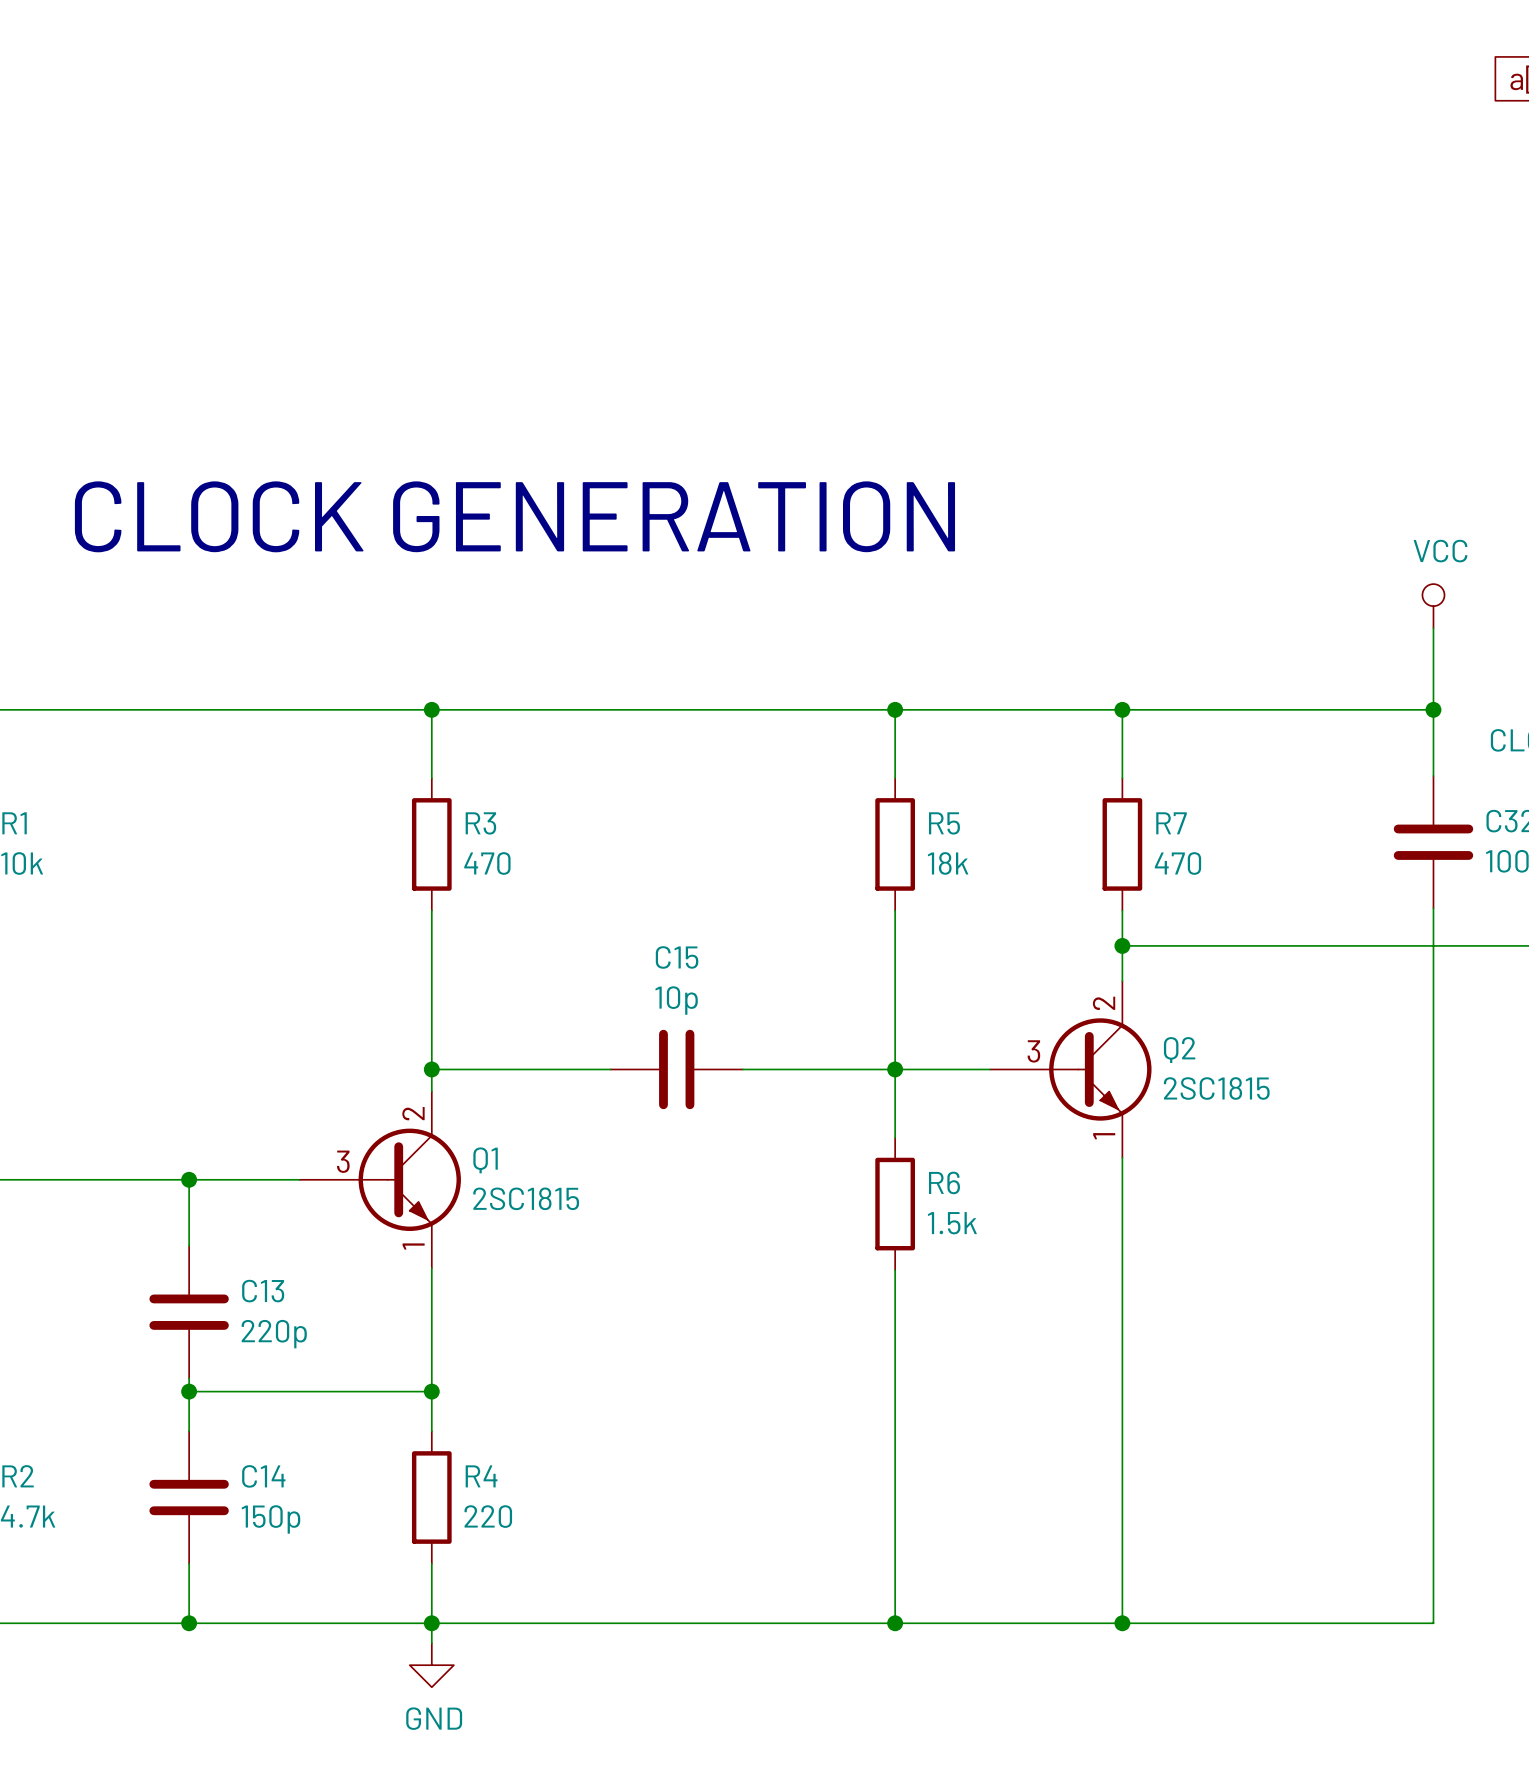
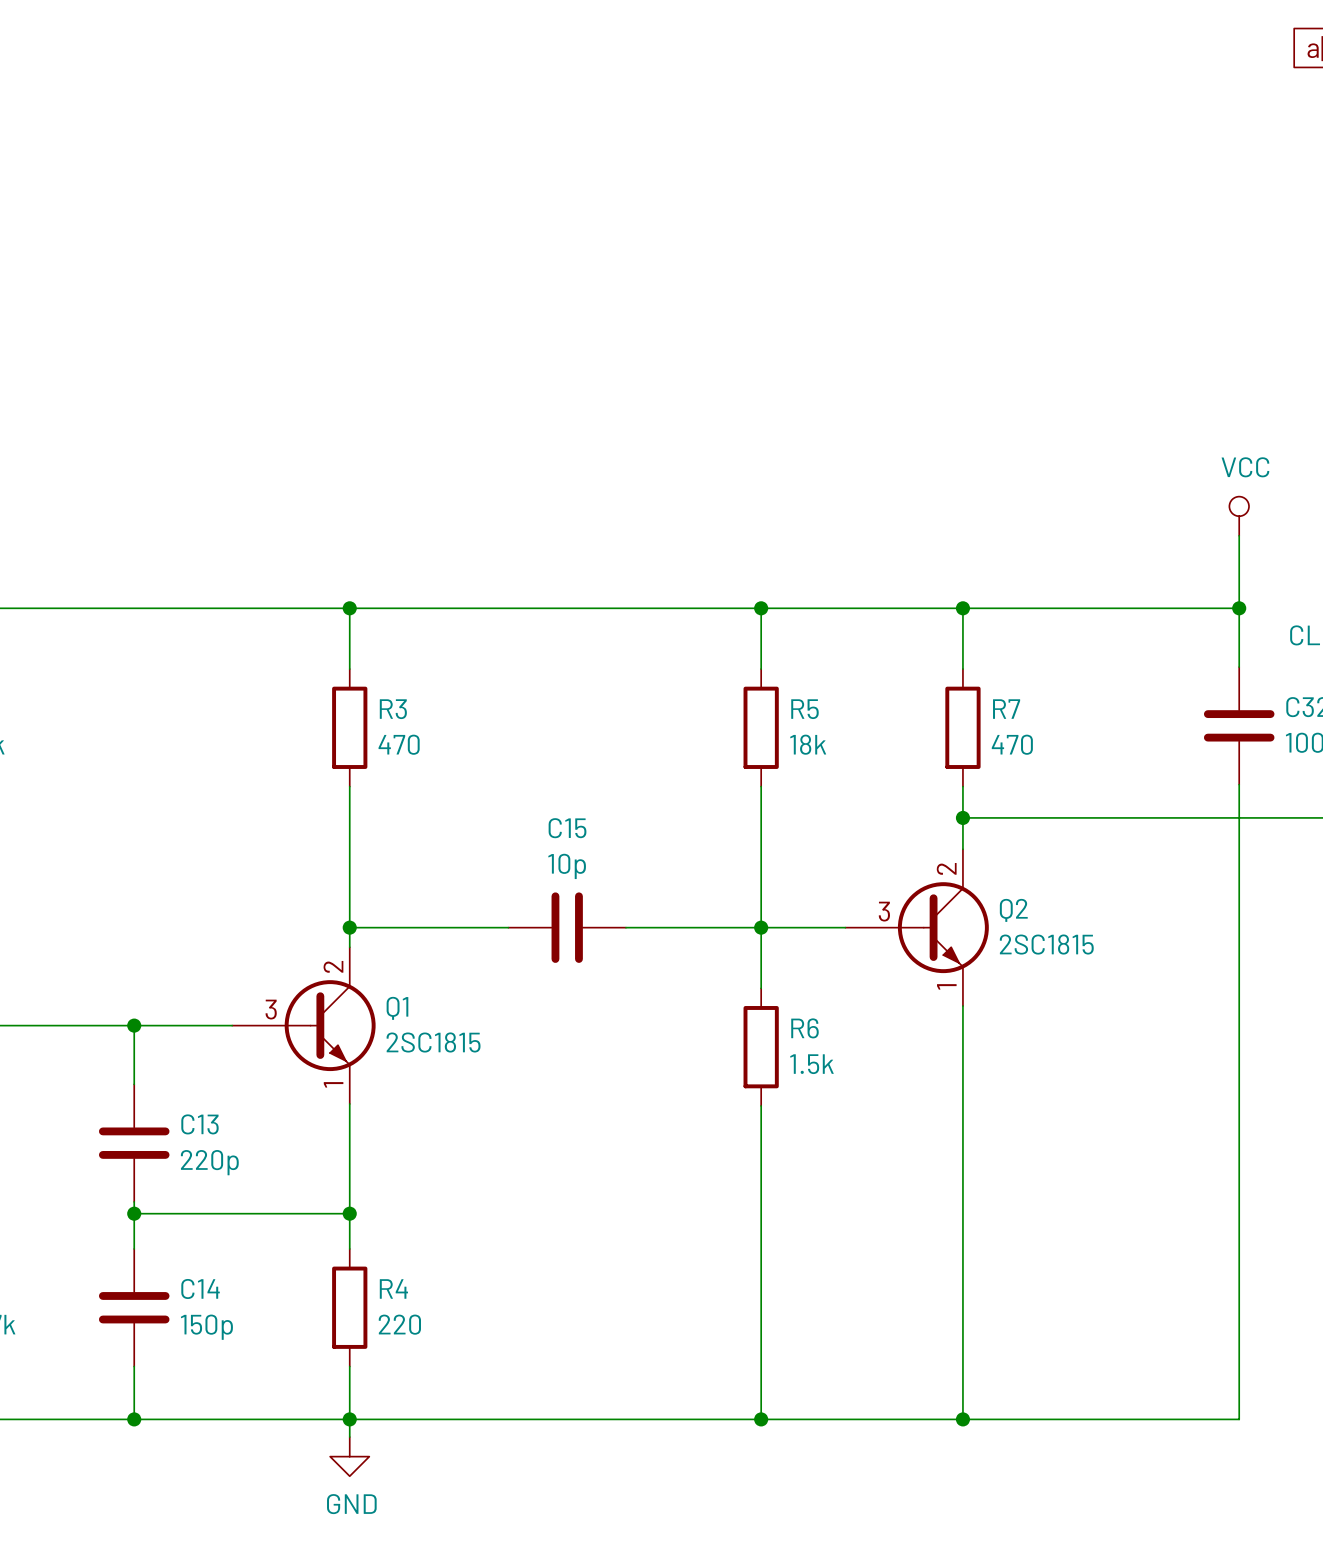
text: CLOCK GENERATION (514, 516) -> none

